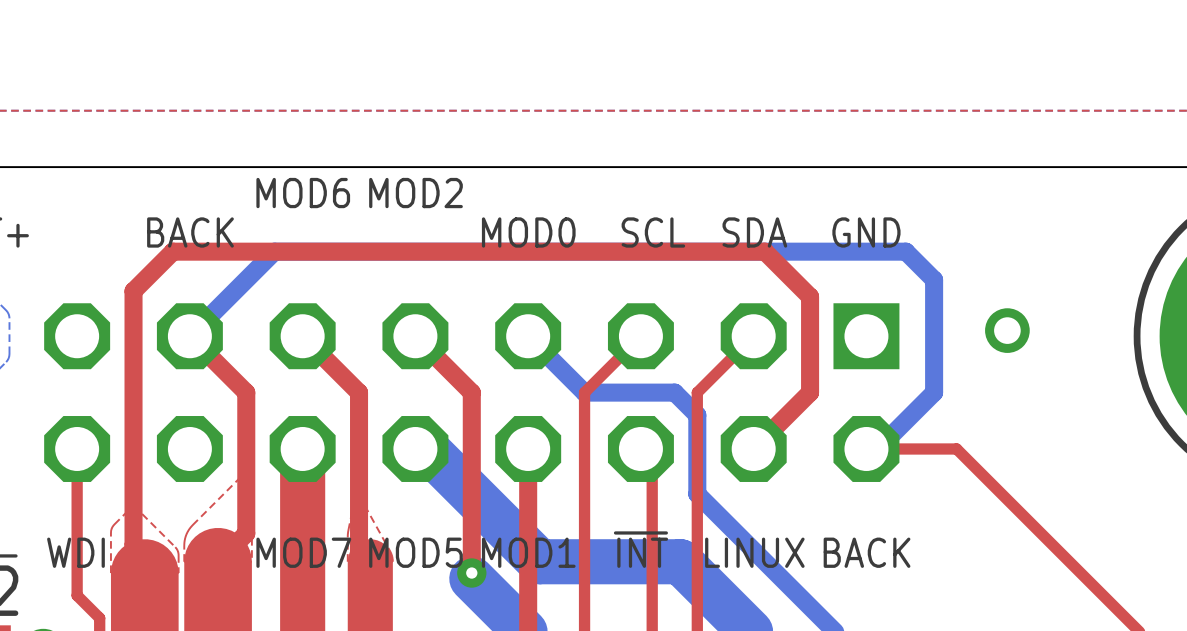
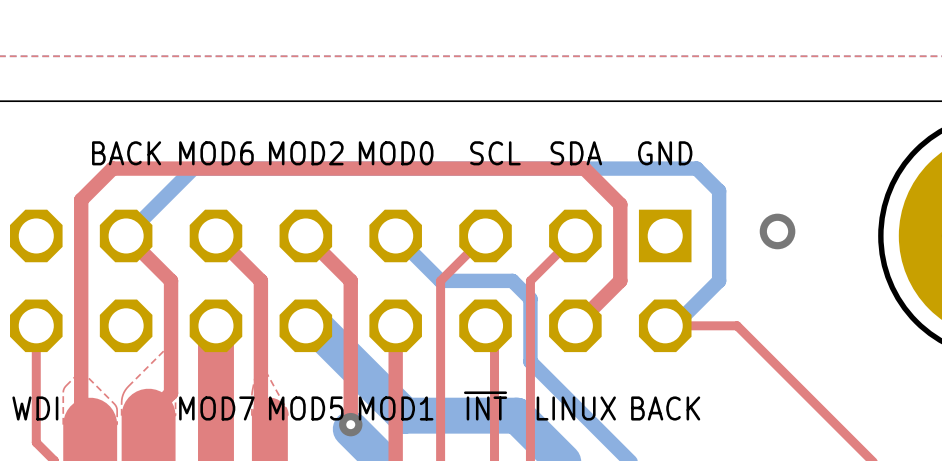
text position: MOD6 (303, 193) -> MOD6 (216, 153)
text position: MOD2 (415, 193) -> MOD2 (306, 153)

